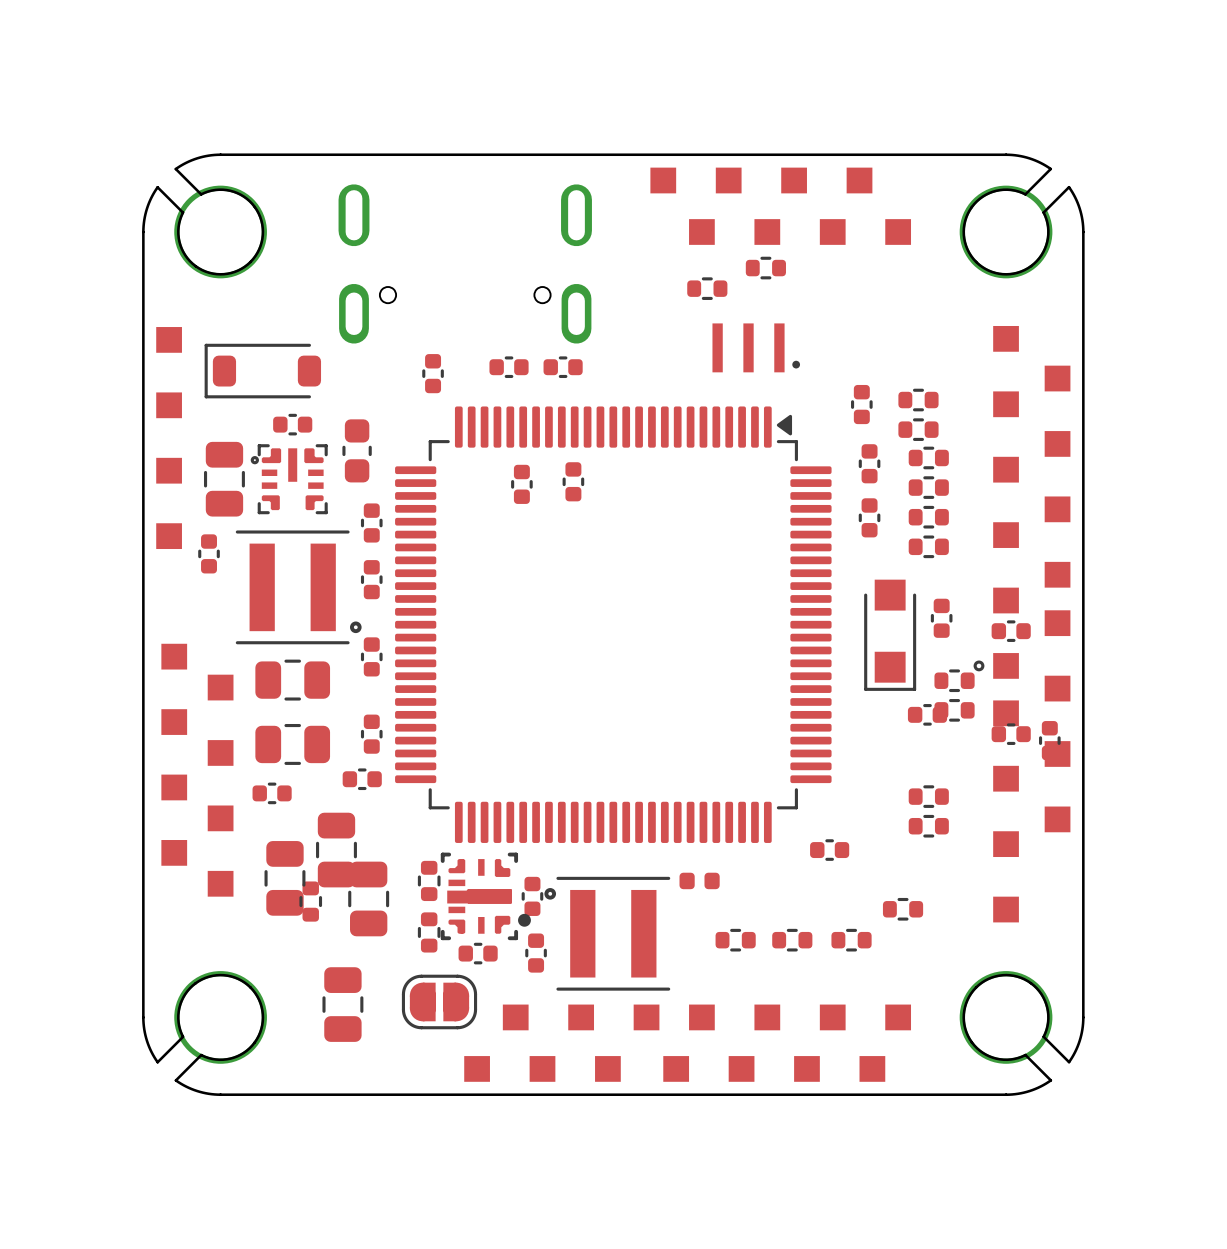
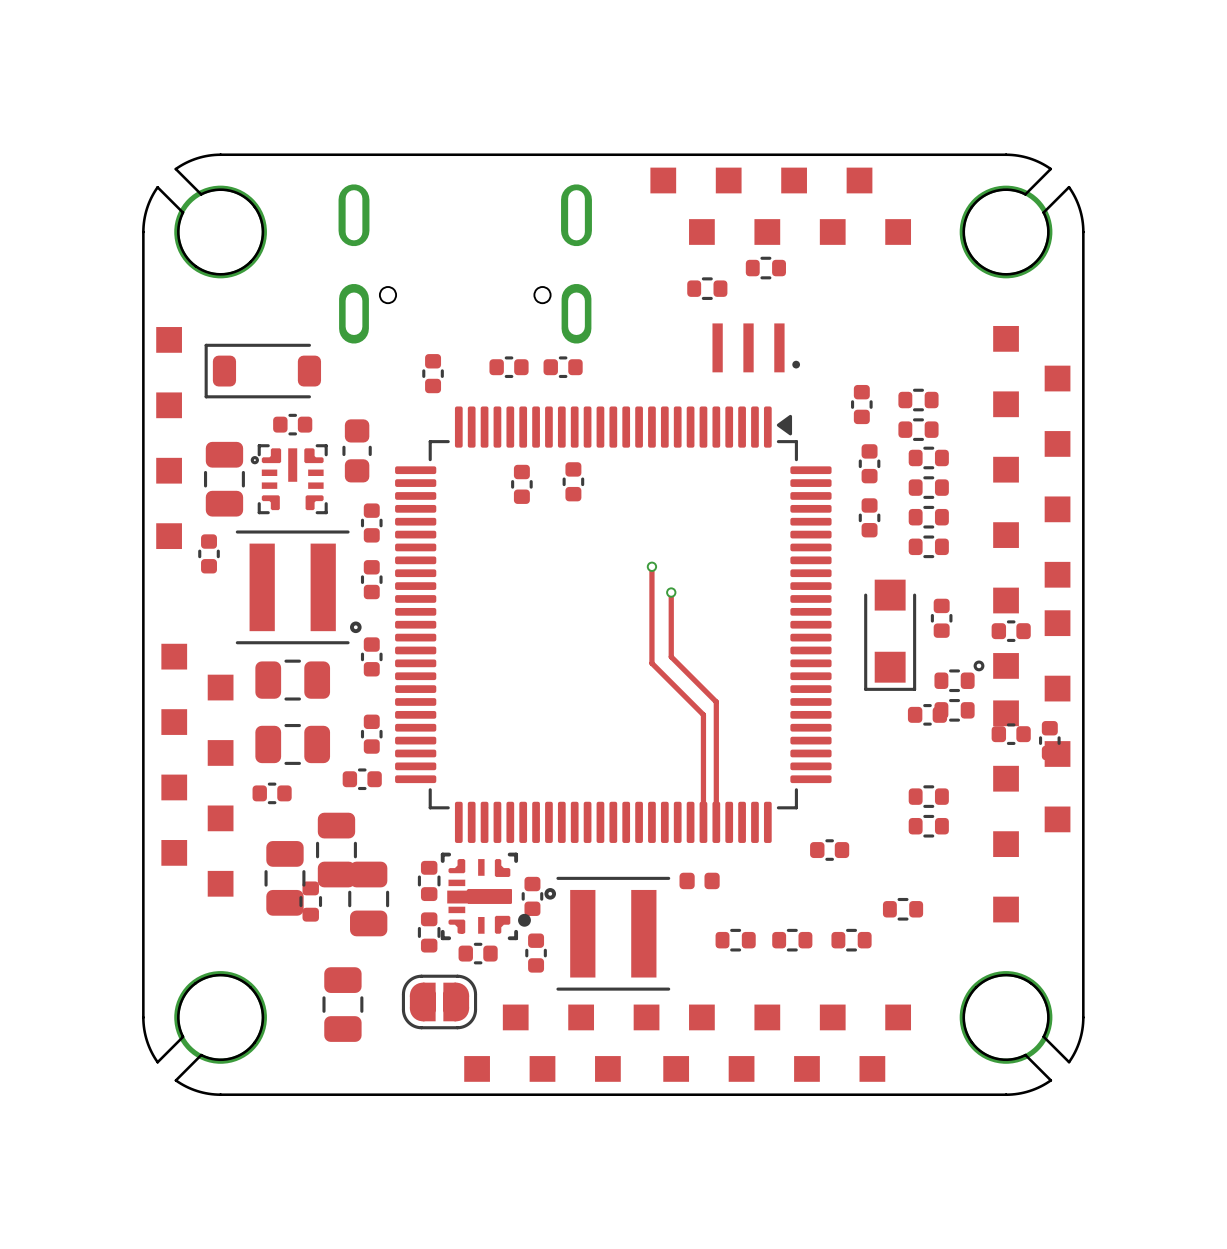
track: none -> (651, 566) (651, 663) (703, 714) (703, 822)
via: none -> (651, 566)
track: none -> (671, 592) (671, 656) (716, 701) (716, 822)
via: none -> (671, 592)

